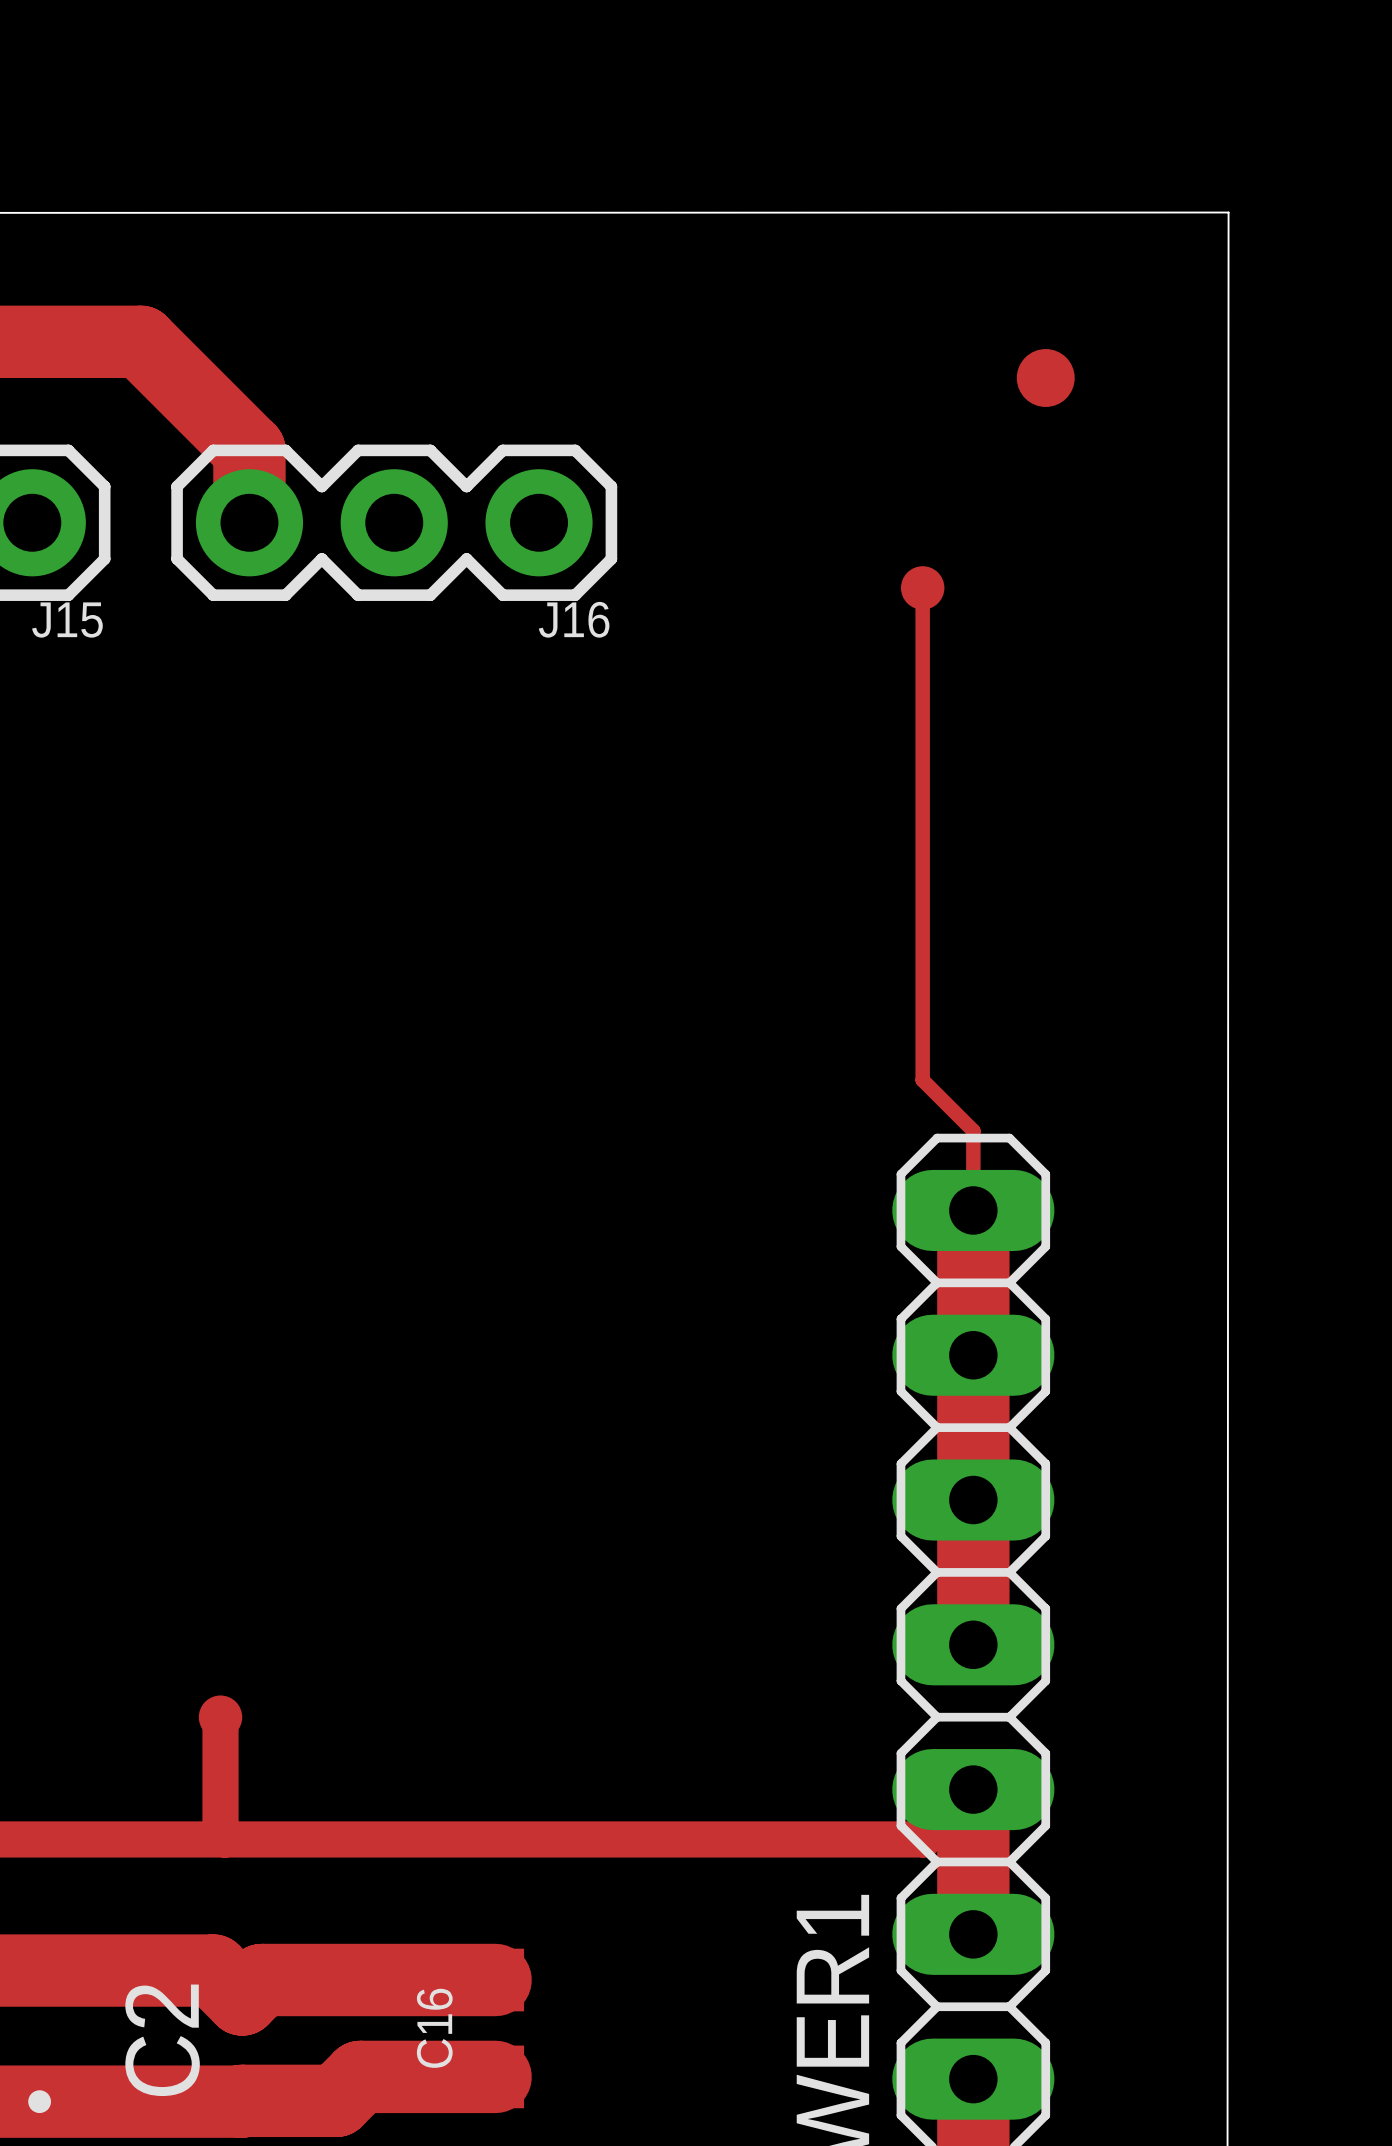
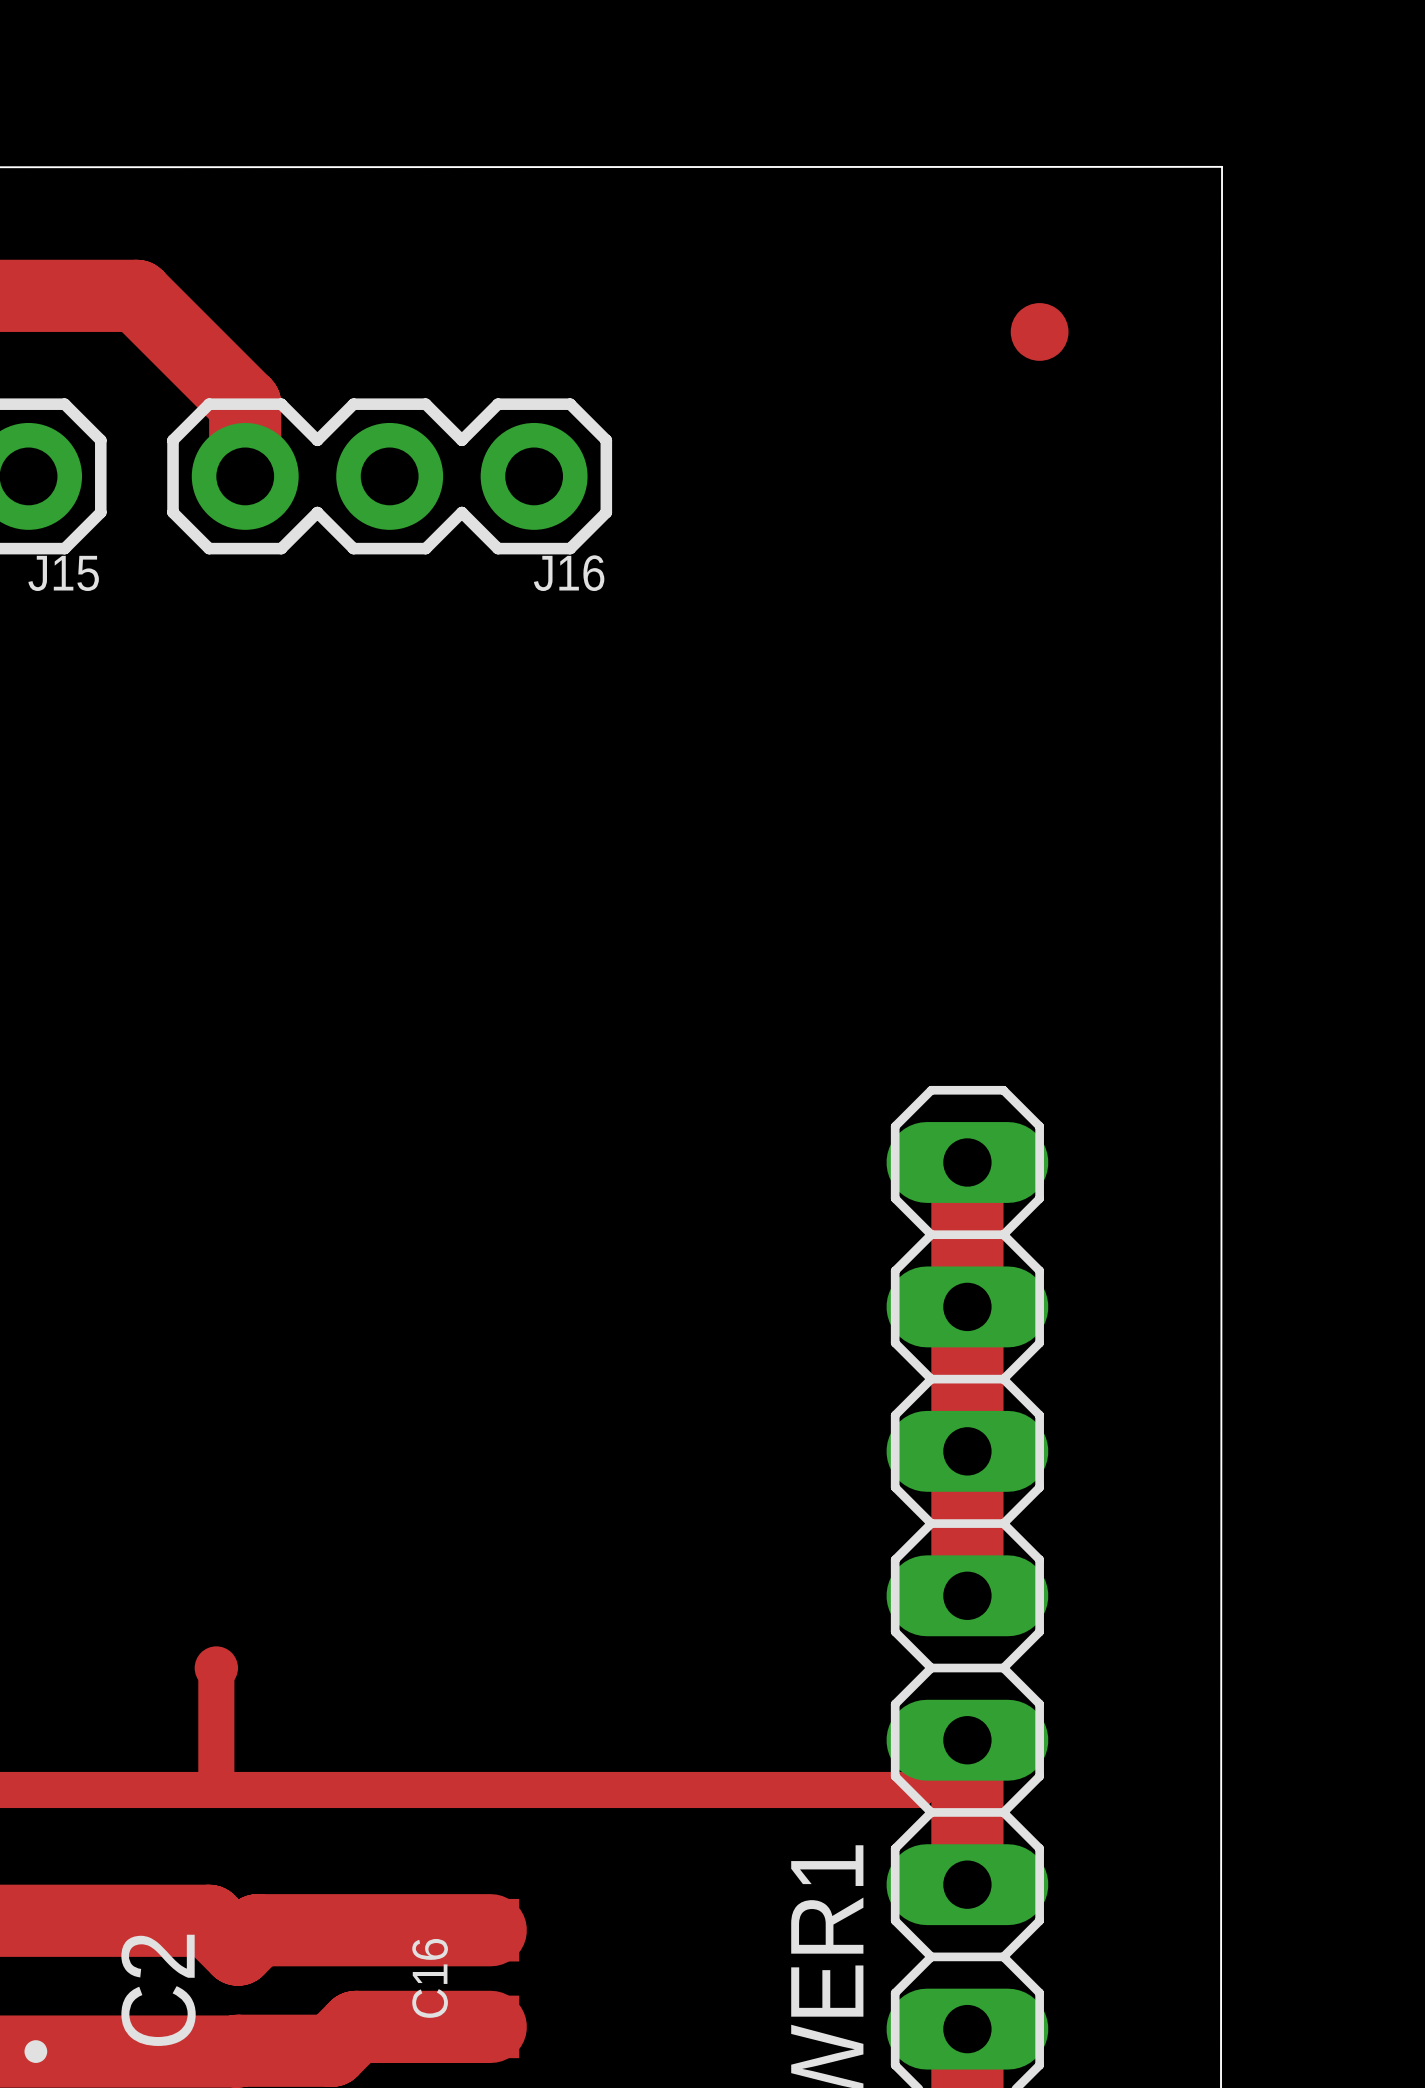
track: (922, 587) (922, 1080) (973, 1130) (973, 1210) -> none
part: (922, 587) -> none

